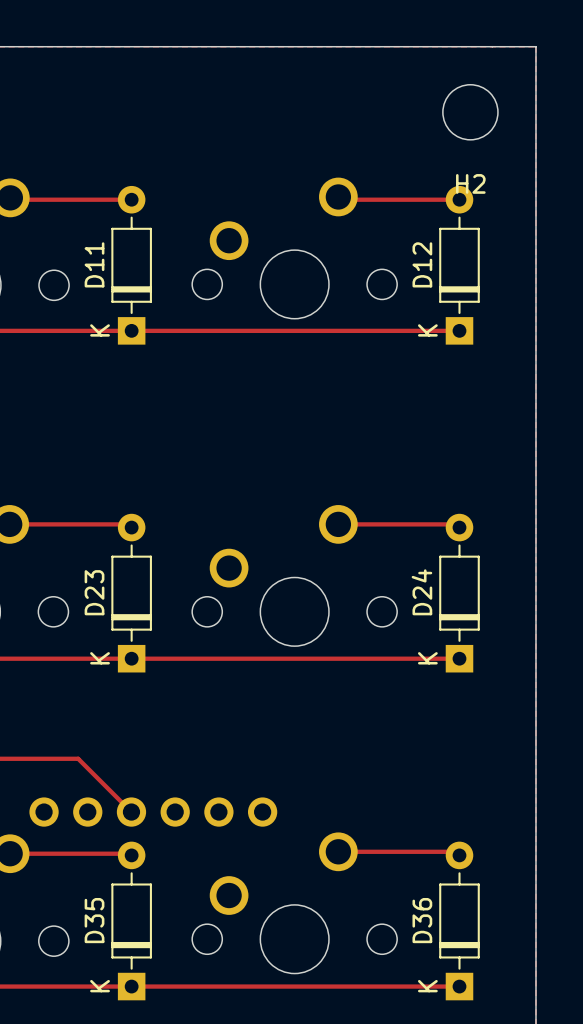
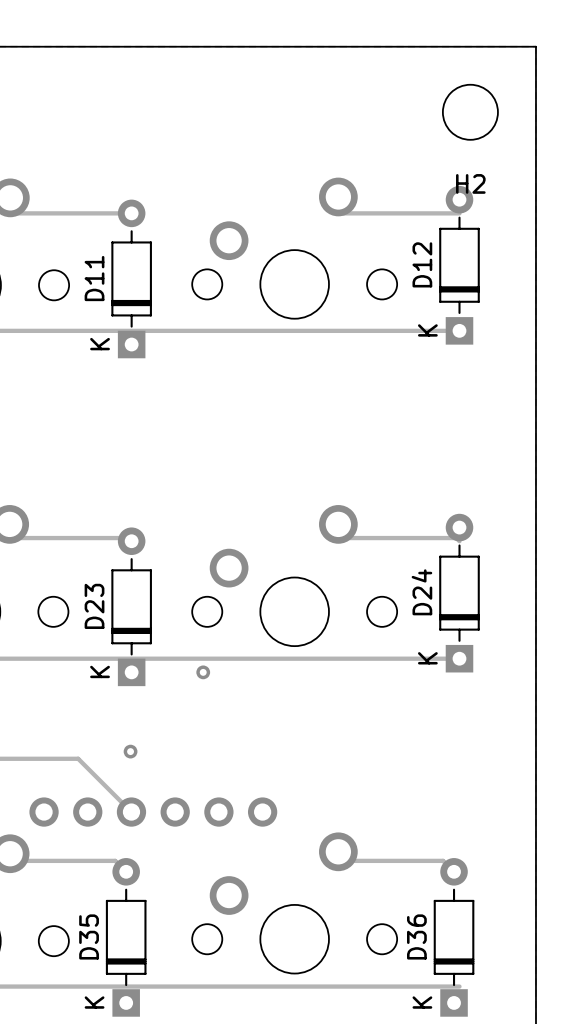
track: (10, 197) (12, 199) (131, 199) -> (10, 211) (12, 213) (131, 213)
track: (341, 199) (459, 199) -> (341, 213) (459, 213)
D11 position: (131, 265) -> (131, 278)
track: (9, 524) (128, 524) (131, 527) -> (9, 538) (128, 538) (131, 541)
track: (338, 524) (456, 524) (459, 527) -> (338, 538) (456, 538) (459, 541)
D23 position: (131, 593) -> (131, 606)
via: none -> (203, 672)
via: none -> (130, 751)
D36 footprint: [439, 841, 480, 1001] -> [433, 858, 475, 1017]
track: (338, 851) (455, 851) (459, 855) -> none
track: (10, 853) (129, 853) (131, 855) -> none
track: none -> (5, 860) (115, 860) (126, 871)
track: none -> (333, 860) (443, 860) (454, 871)
D35 position: (131, 920) -> (126, 937)

